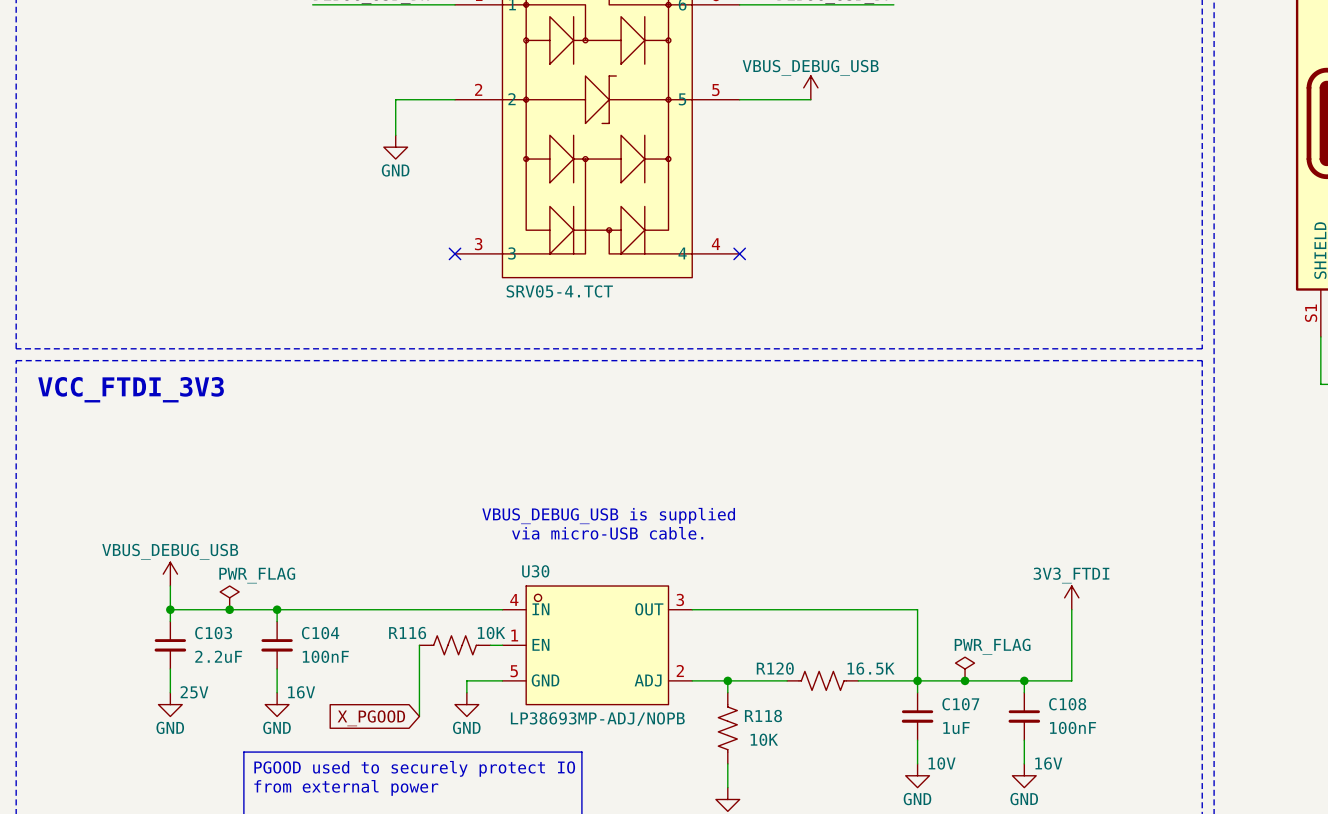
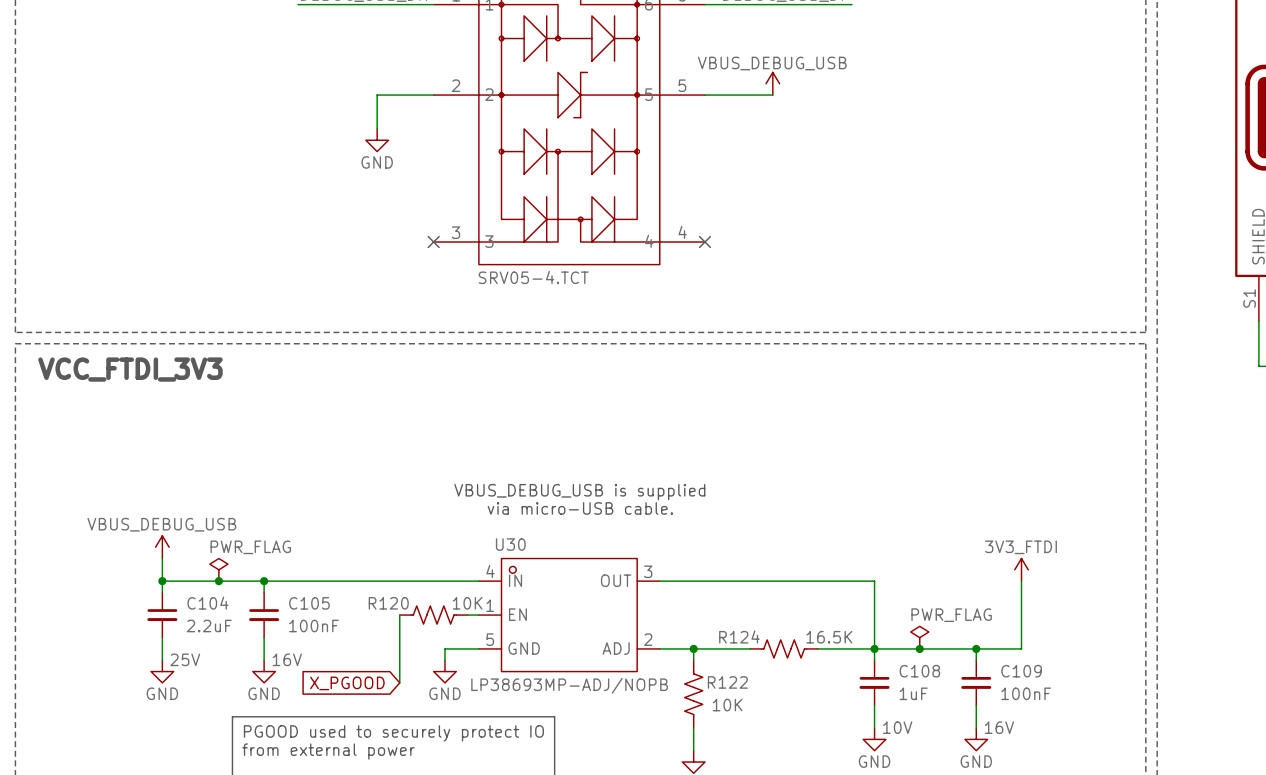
C103 name: C103 (213, 633) -> C104 (207, 603)
C104 name: C104 (320, 633) -> C105 (309, 603)
R116 name: R116 (407, 633) -> R120 (388, 603)
R120 name: R120 (775, 668) -> R124 (739, 636)
C107 name: C107 (960, 704) -> C108 (919, 671)
C108 name: C108 (1067, 704) -> C109 (1021, 671)
R118 name: R118 (763, 716) -> R122 (727, 682)

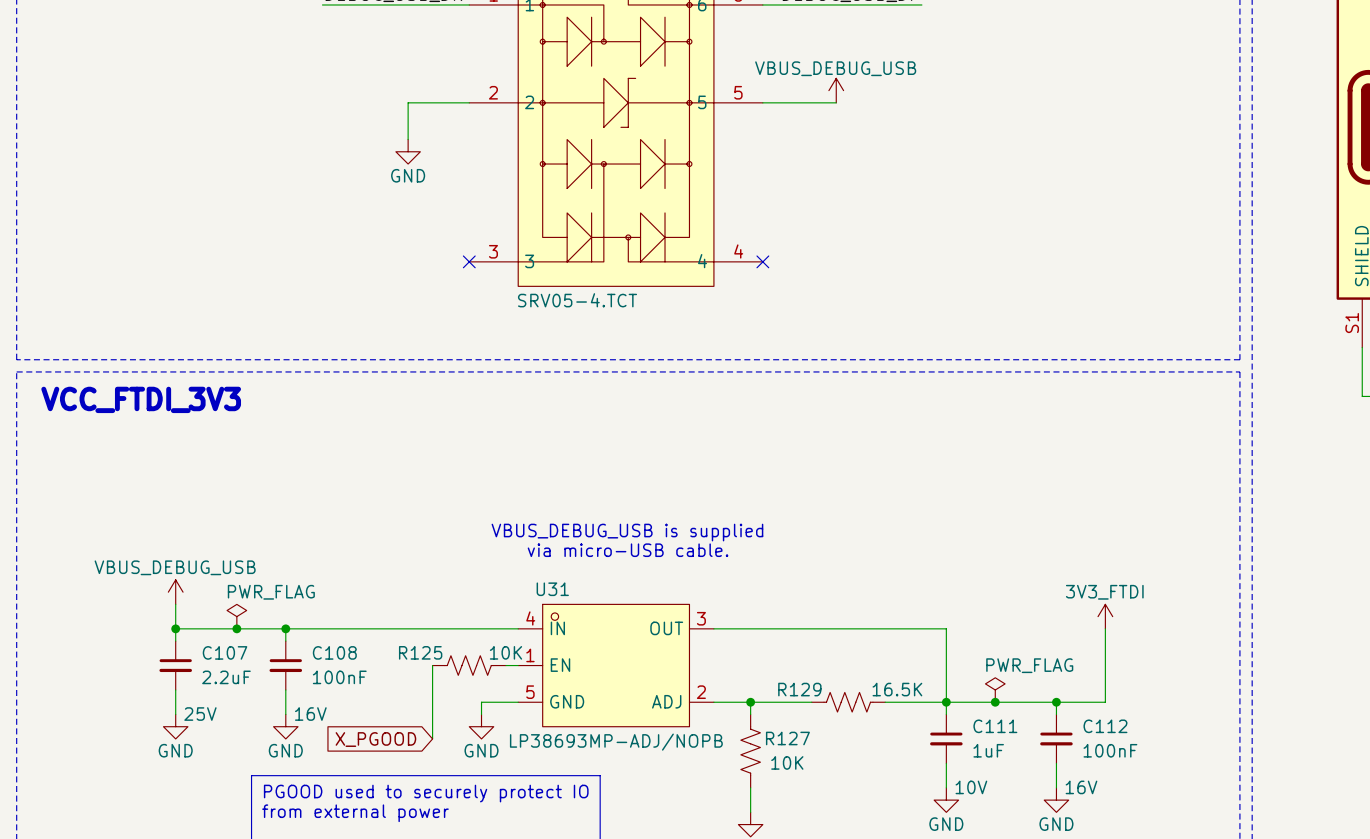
U30 name: U30 (510, 544) -> U31 (552, 589)
C104 name: C104 (207, 603) -> C107 (225, 652)
C105 name: C105 (309, 603) -> C108 (334, 652)
R120 name: R120 (388, 603) -> R125 (420, 652)
R124 name: R124 (739, 636) -> R129 (799, 689)
C108 name: C108 (919, 671) -> C111 (995, 726)
C109 name: C109 (1021, 671) -> C112 (1105, 726)
R122 name: R122 (727, 682) -> R127 (787, 738)

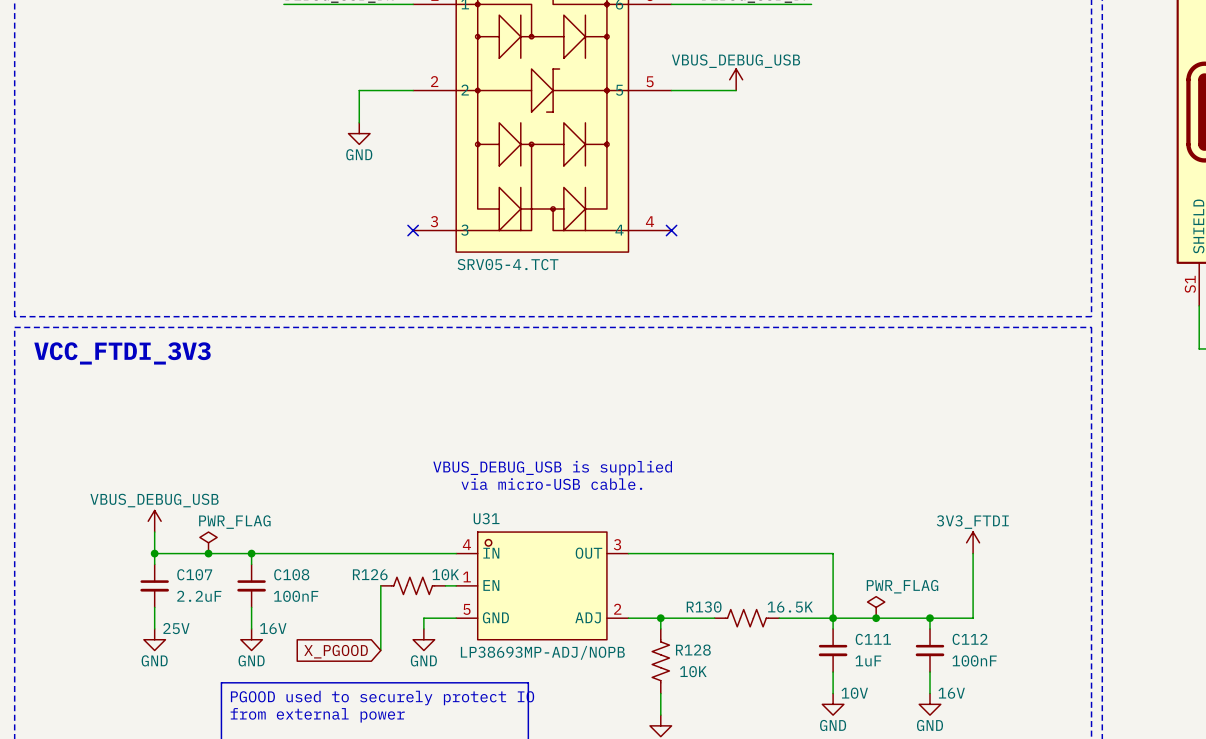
R125 name: R125 (420, 652) -> R126 (370, 574)
R129 name: R129 (799, 689) -> R130 (704, 607)
R127 name: R127 (787, 738) -> R128 (693, 650)

